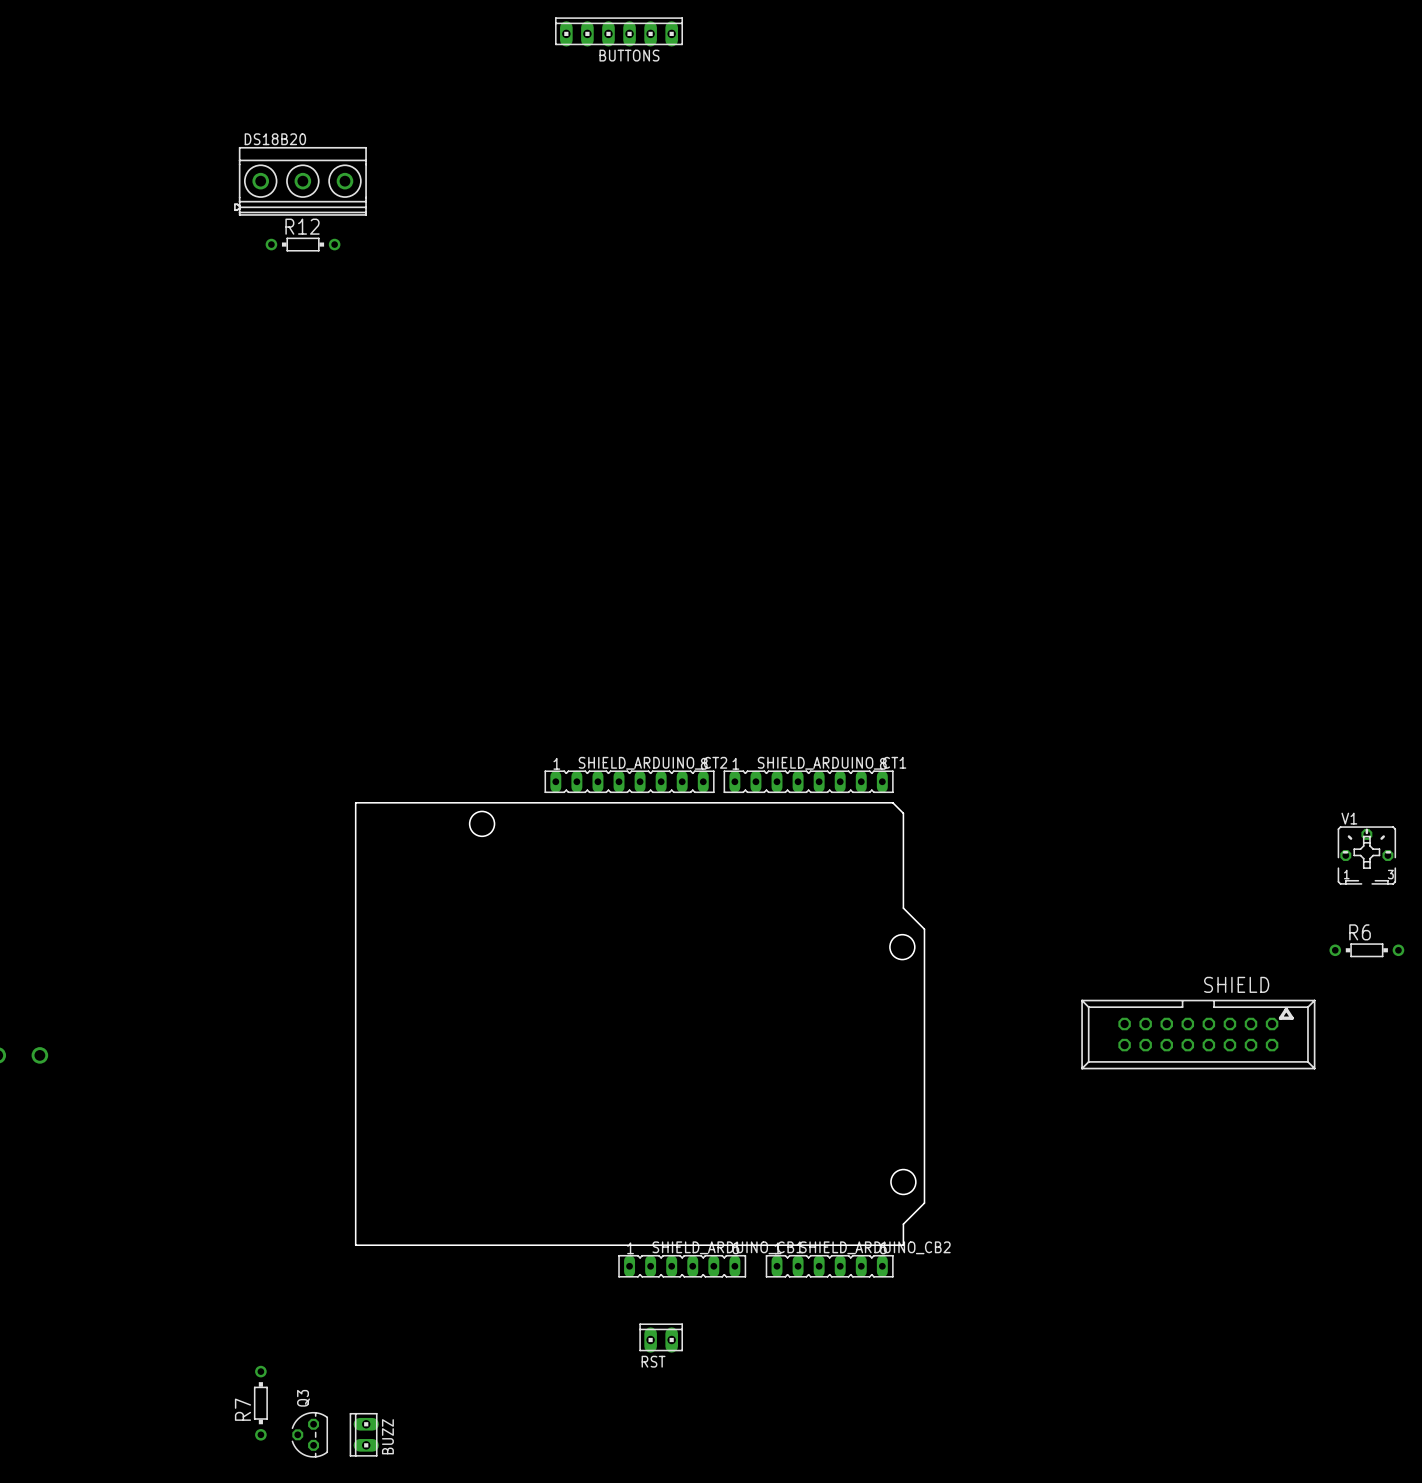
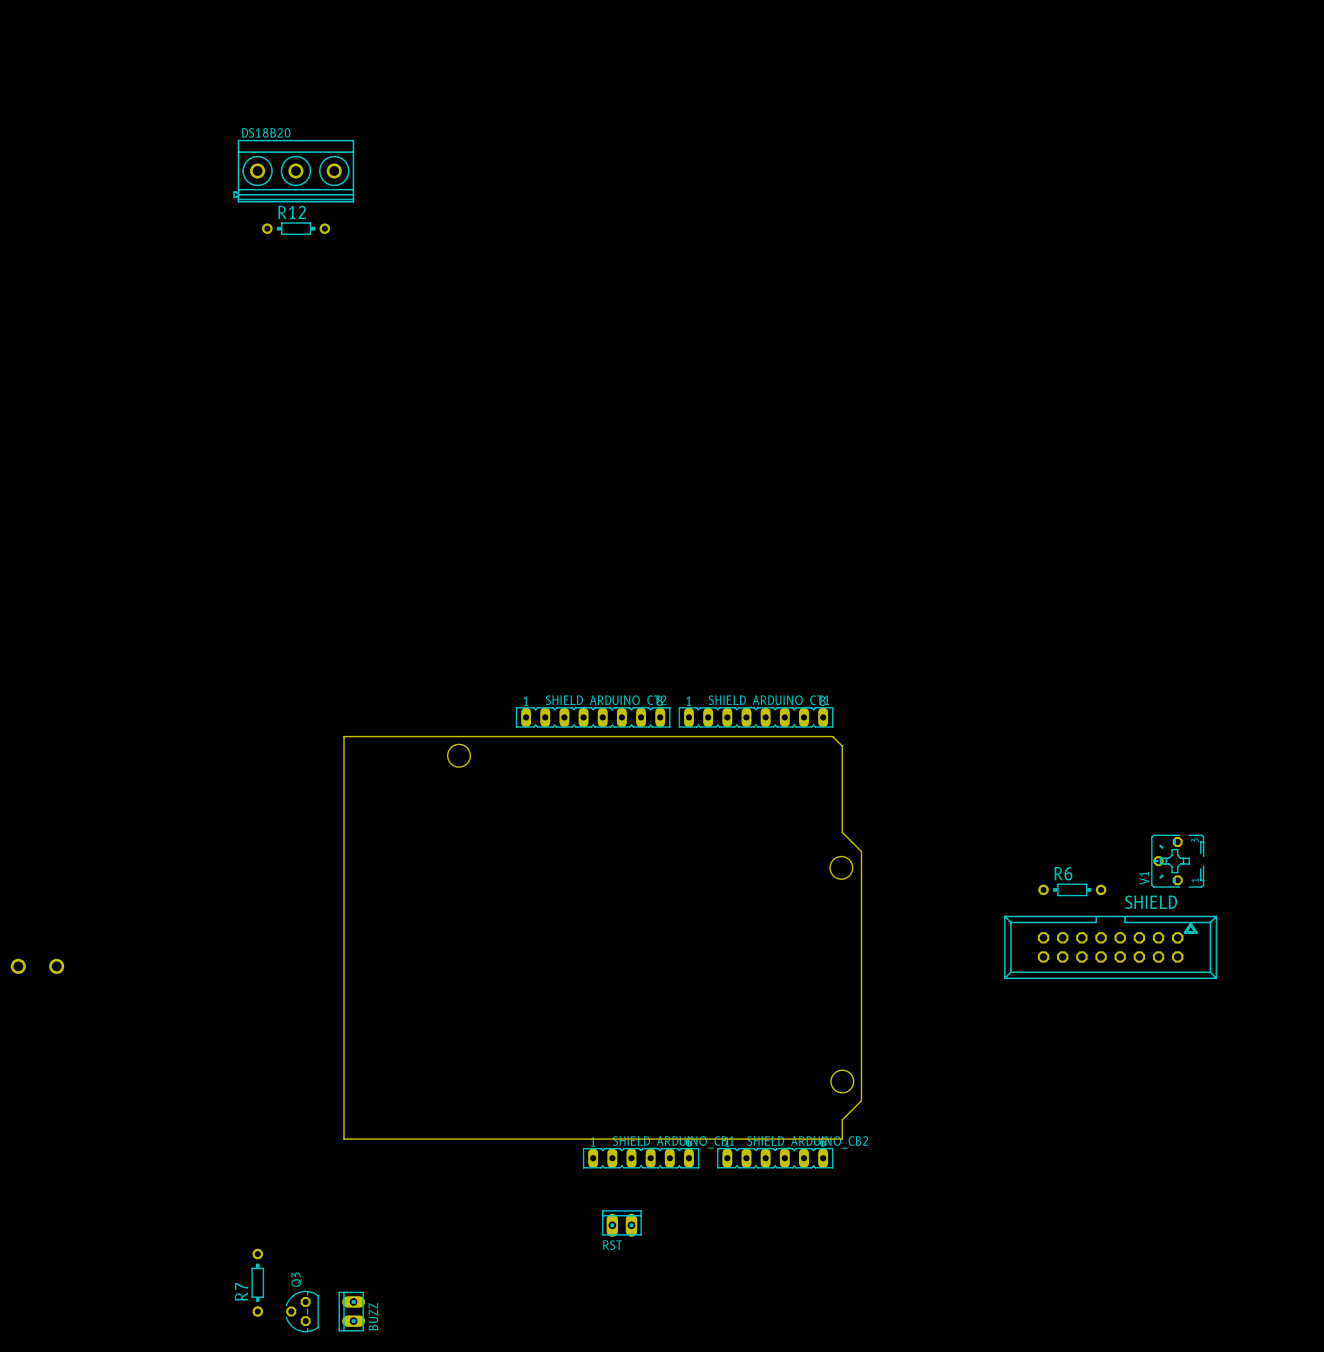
BUTTONS: (619, 32) -> none
V1 rotation: 0° (1366, 855) -> 90° counterclockwise (1177, 861)
V1 position: (1366, 855) -> (1177, 861)
R6 position: (1366, 950) -> (1072, 889)

